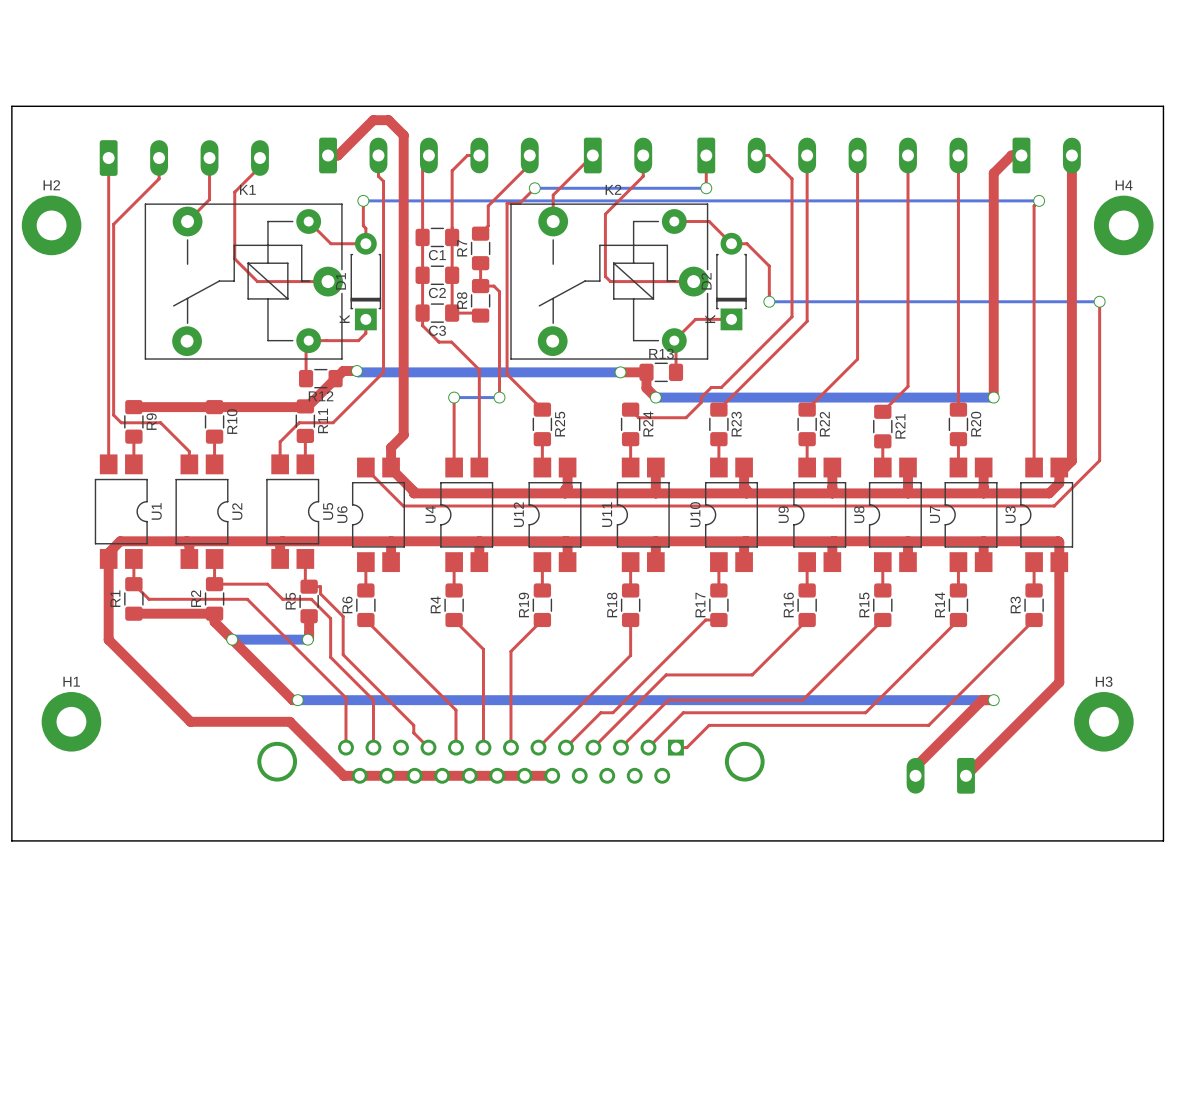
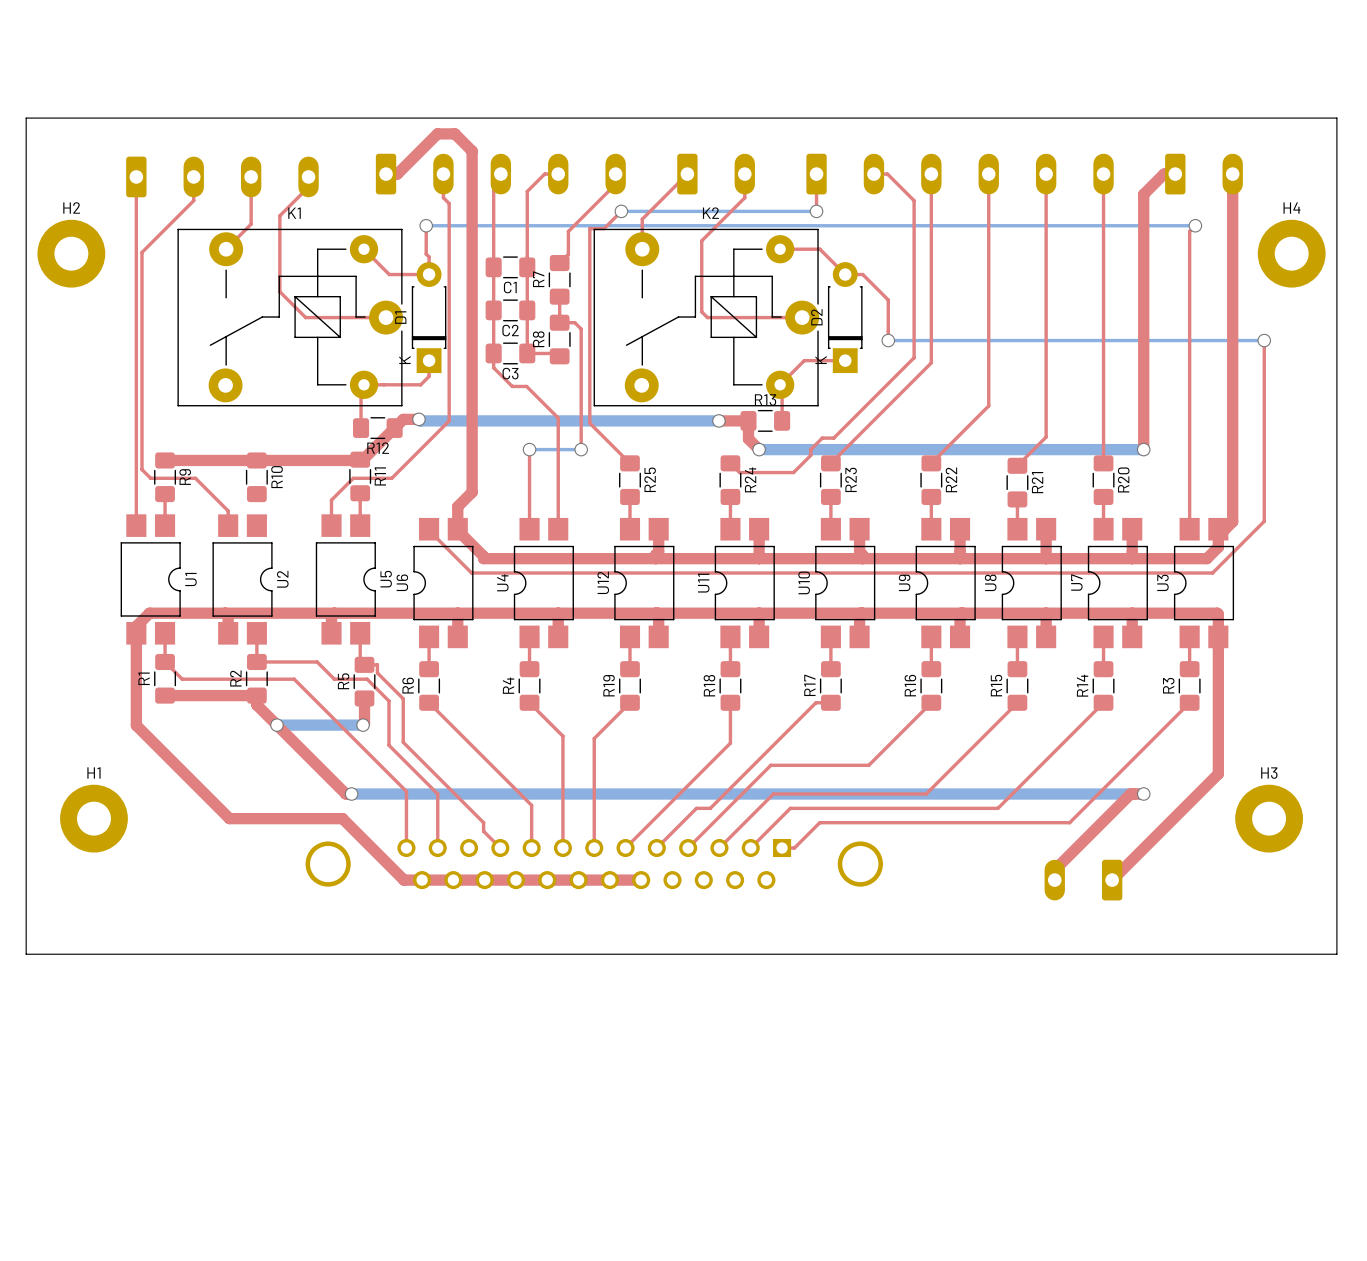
top track: (214, 436) (214, 464) -> none

